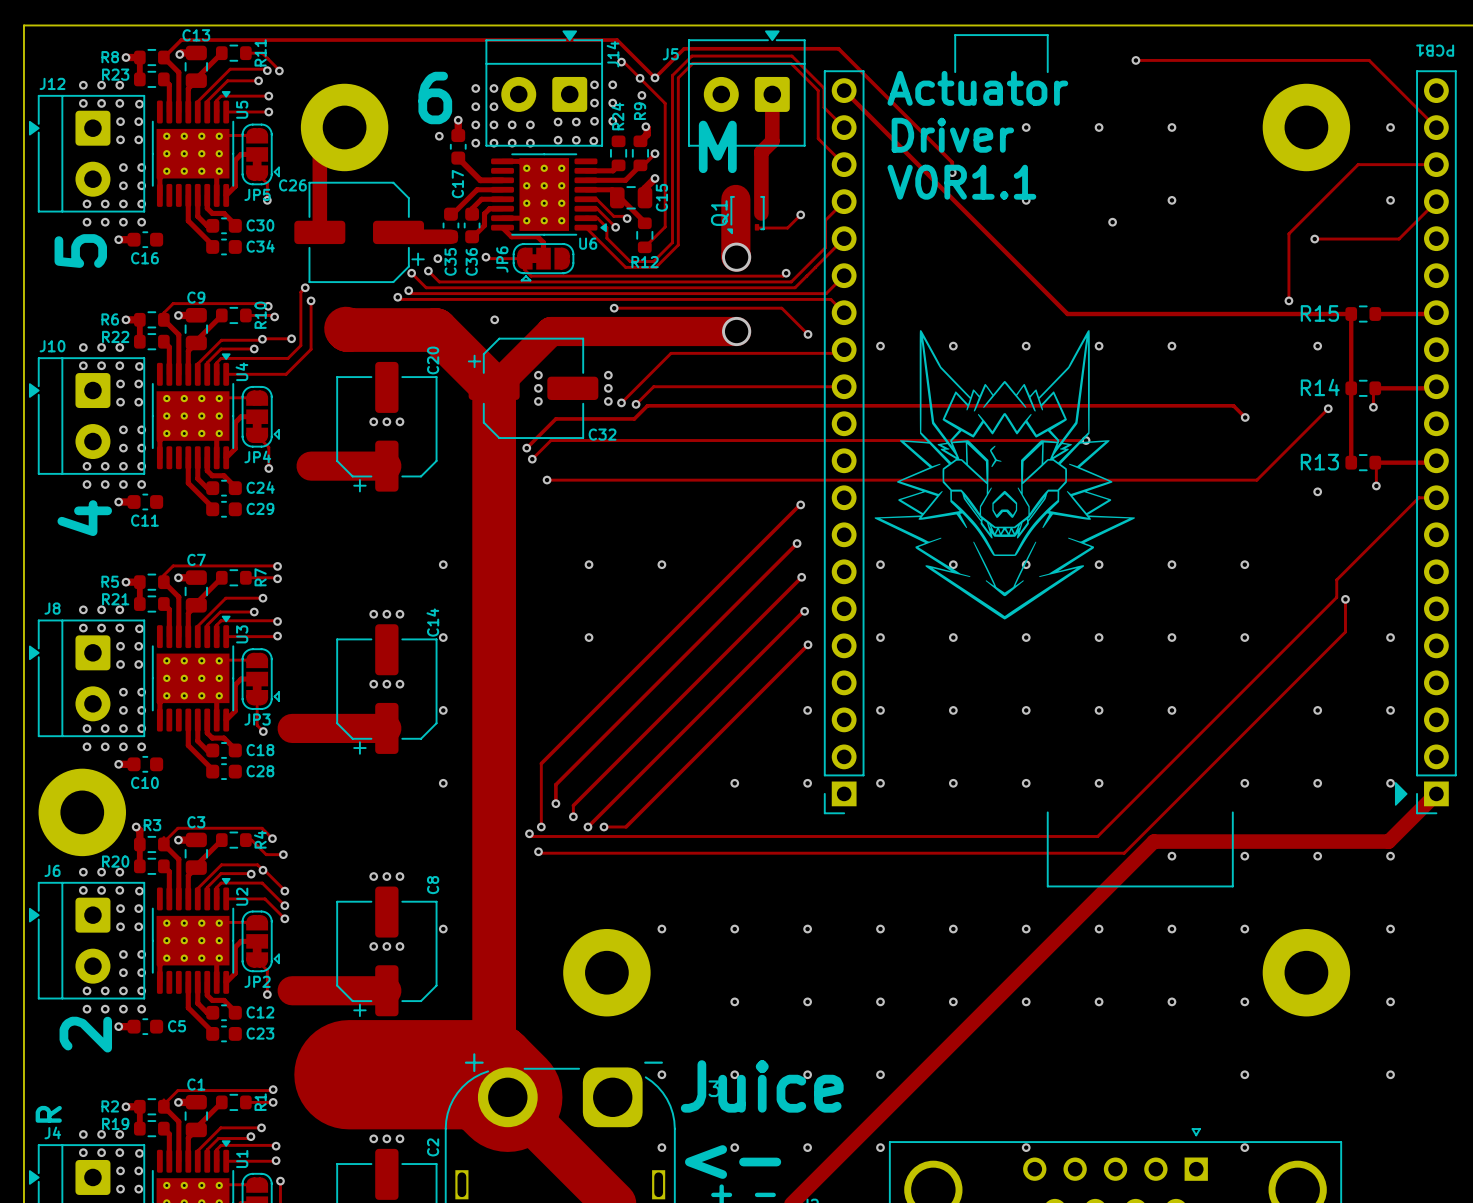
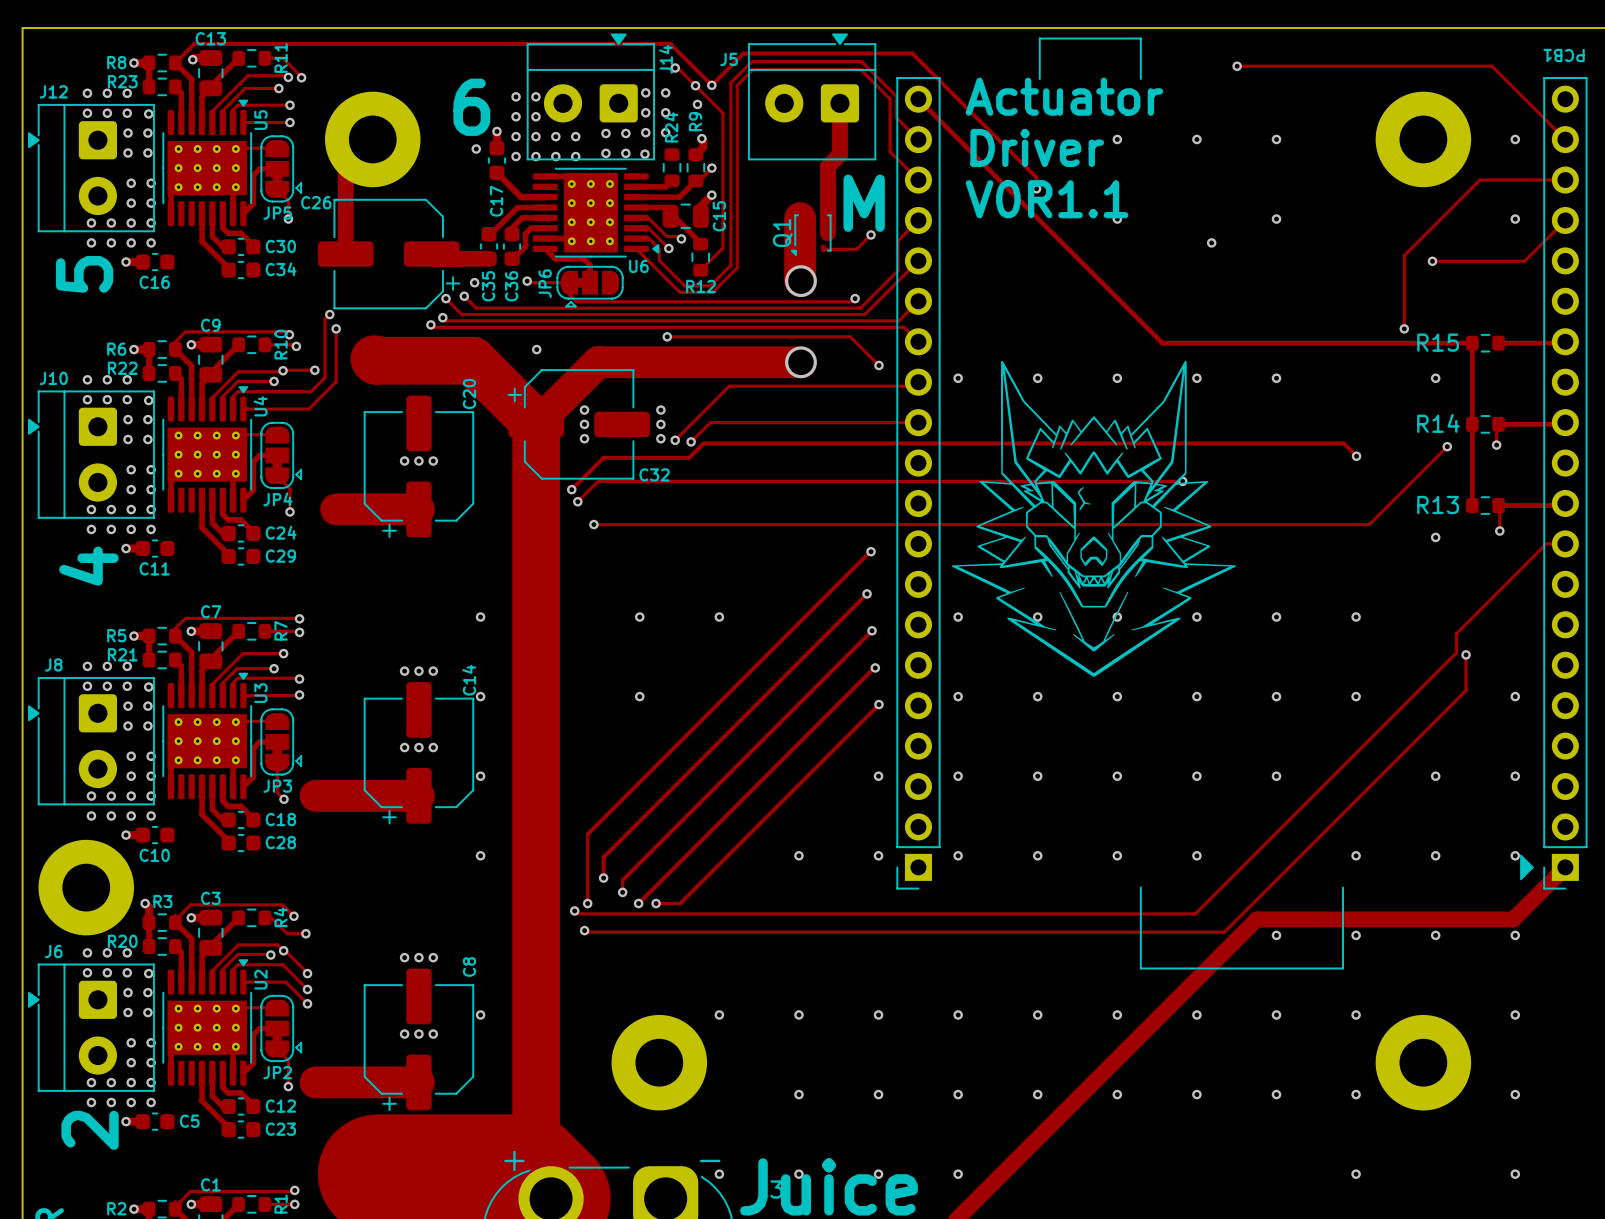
text position: M (717, 146) -> M (864, 203)

